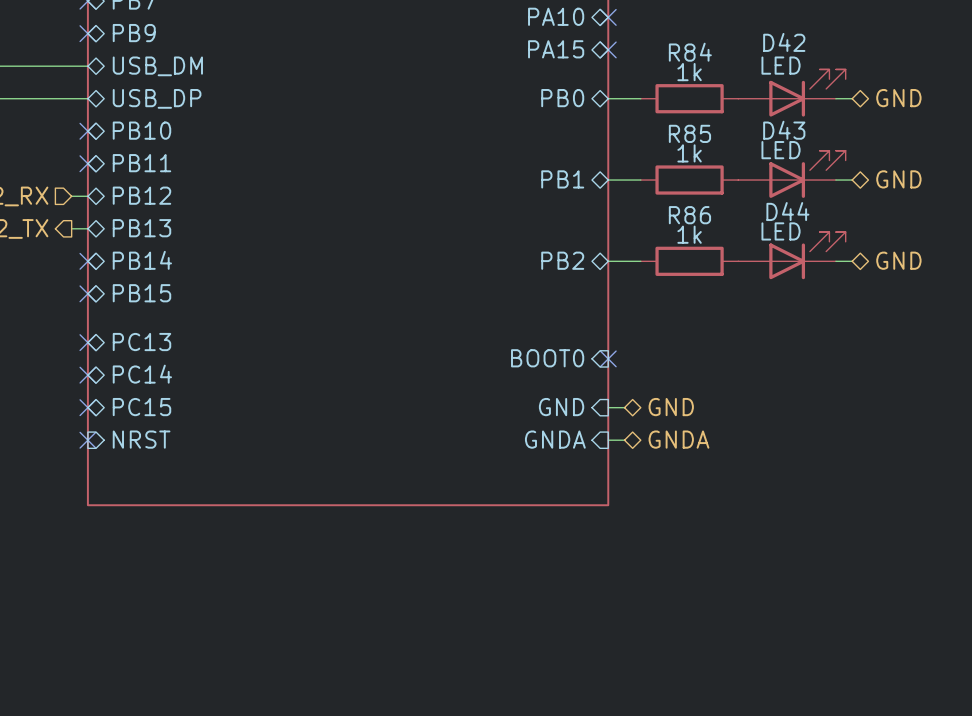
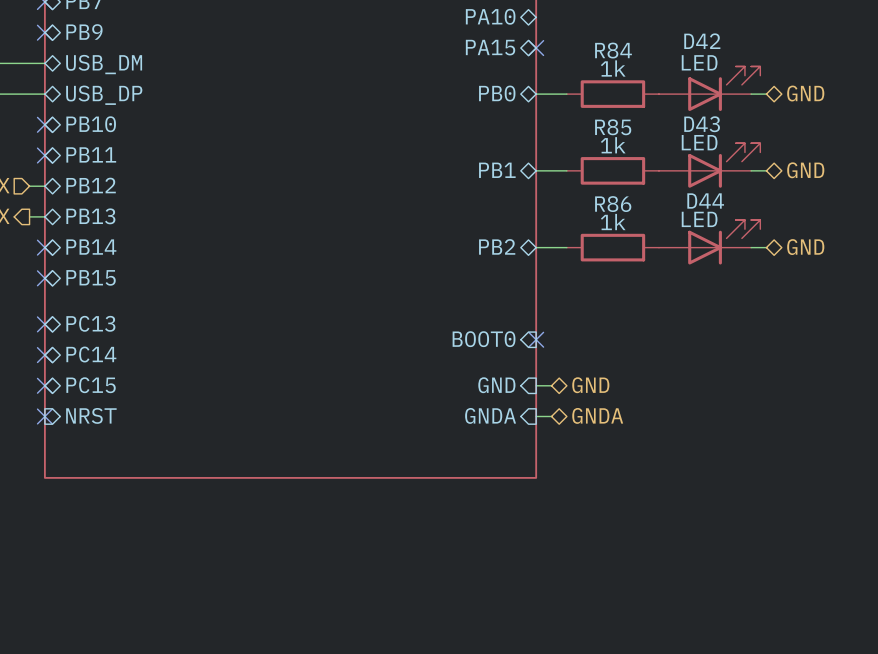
no-connect mark: (608, 17) -> none

